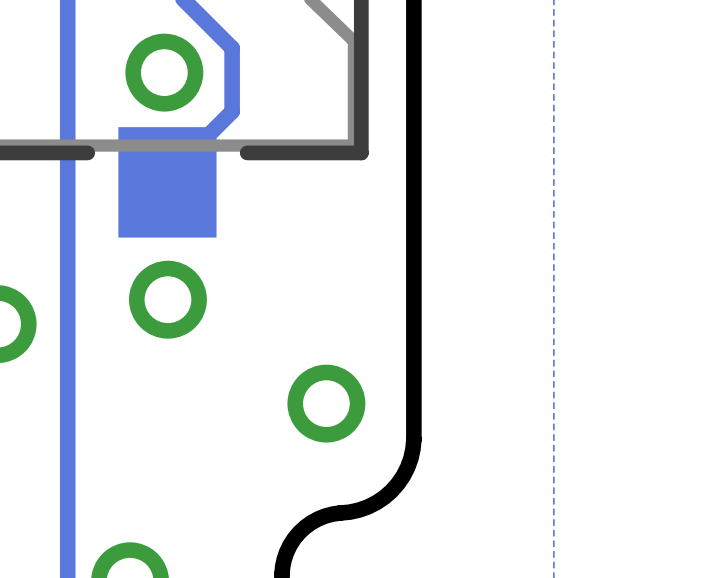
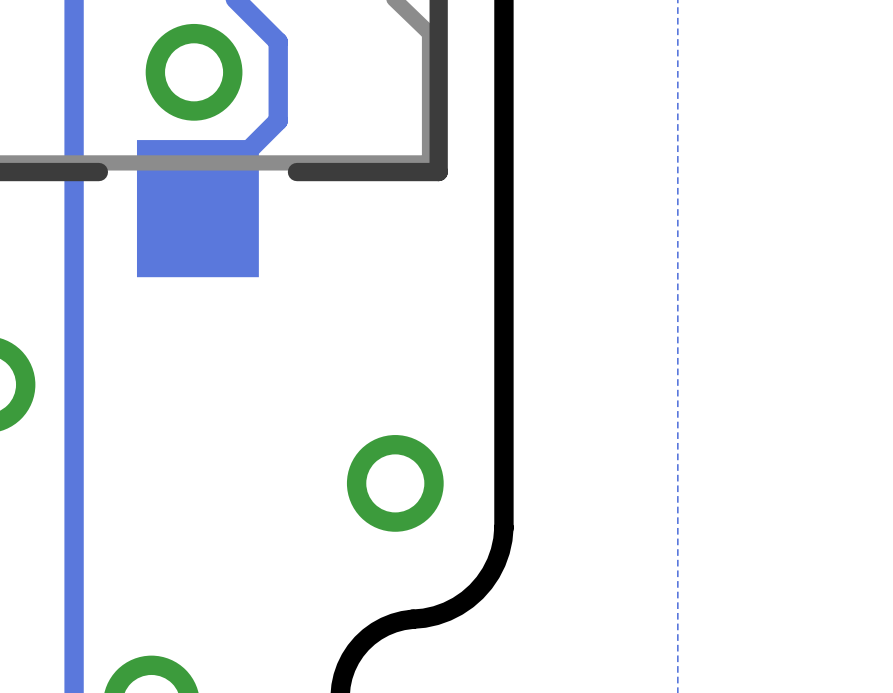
via: (167, 299) -> none

